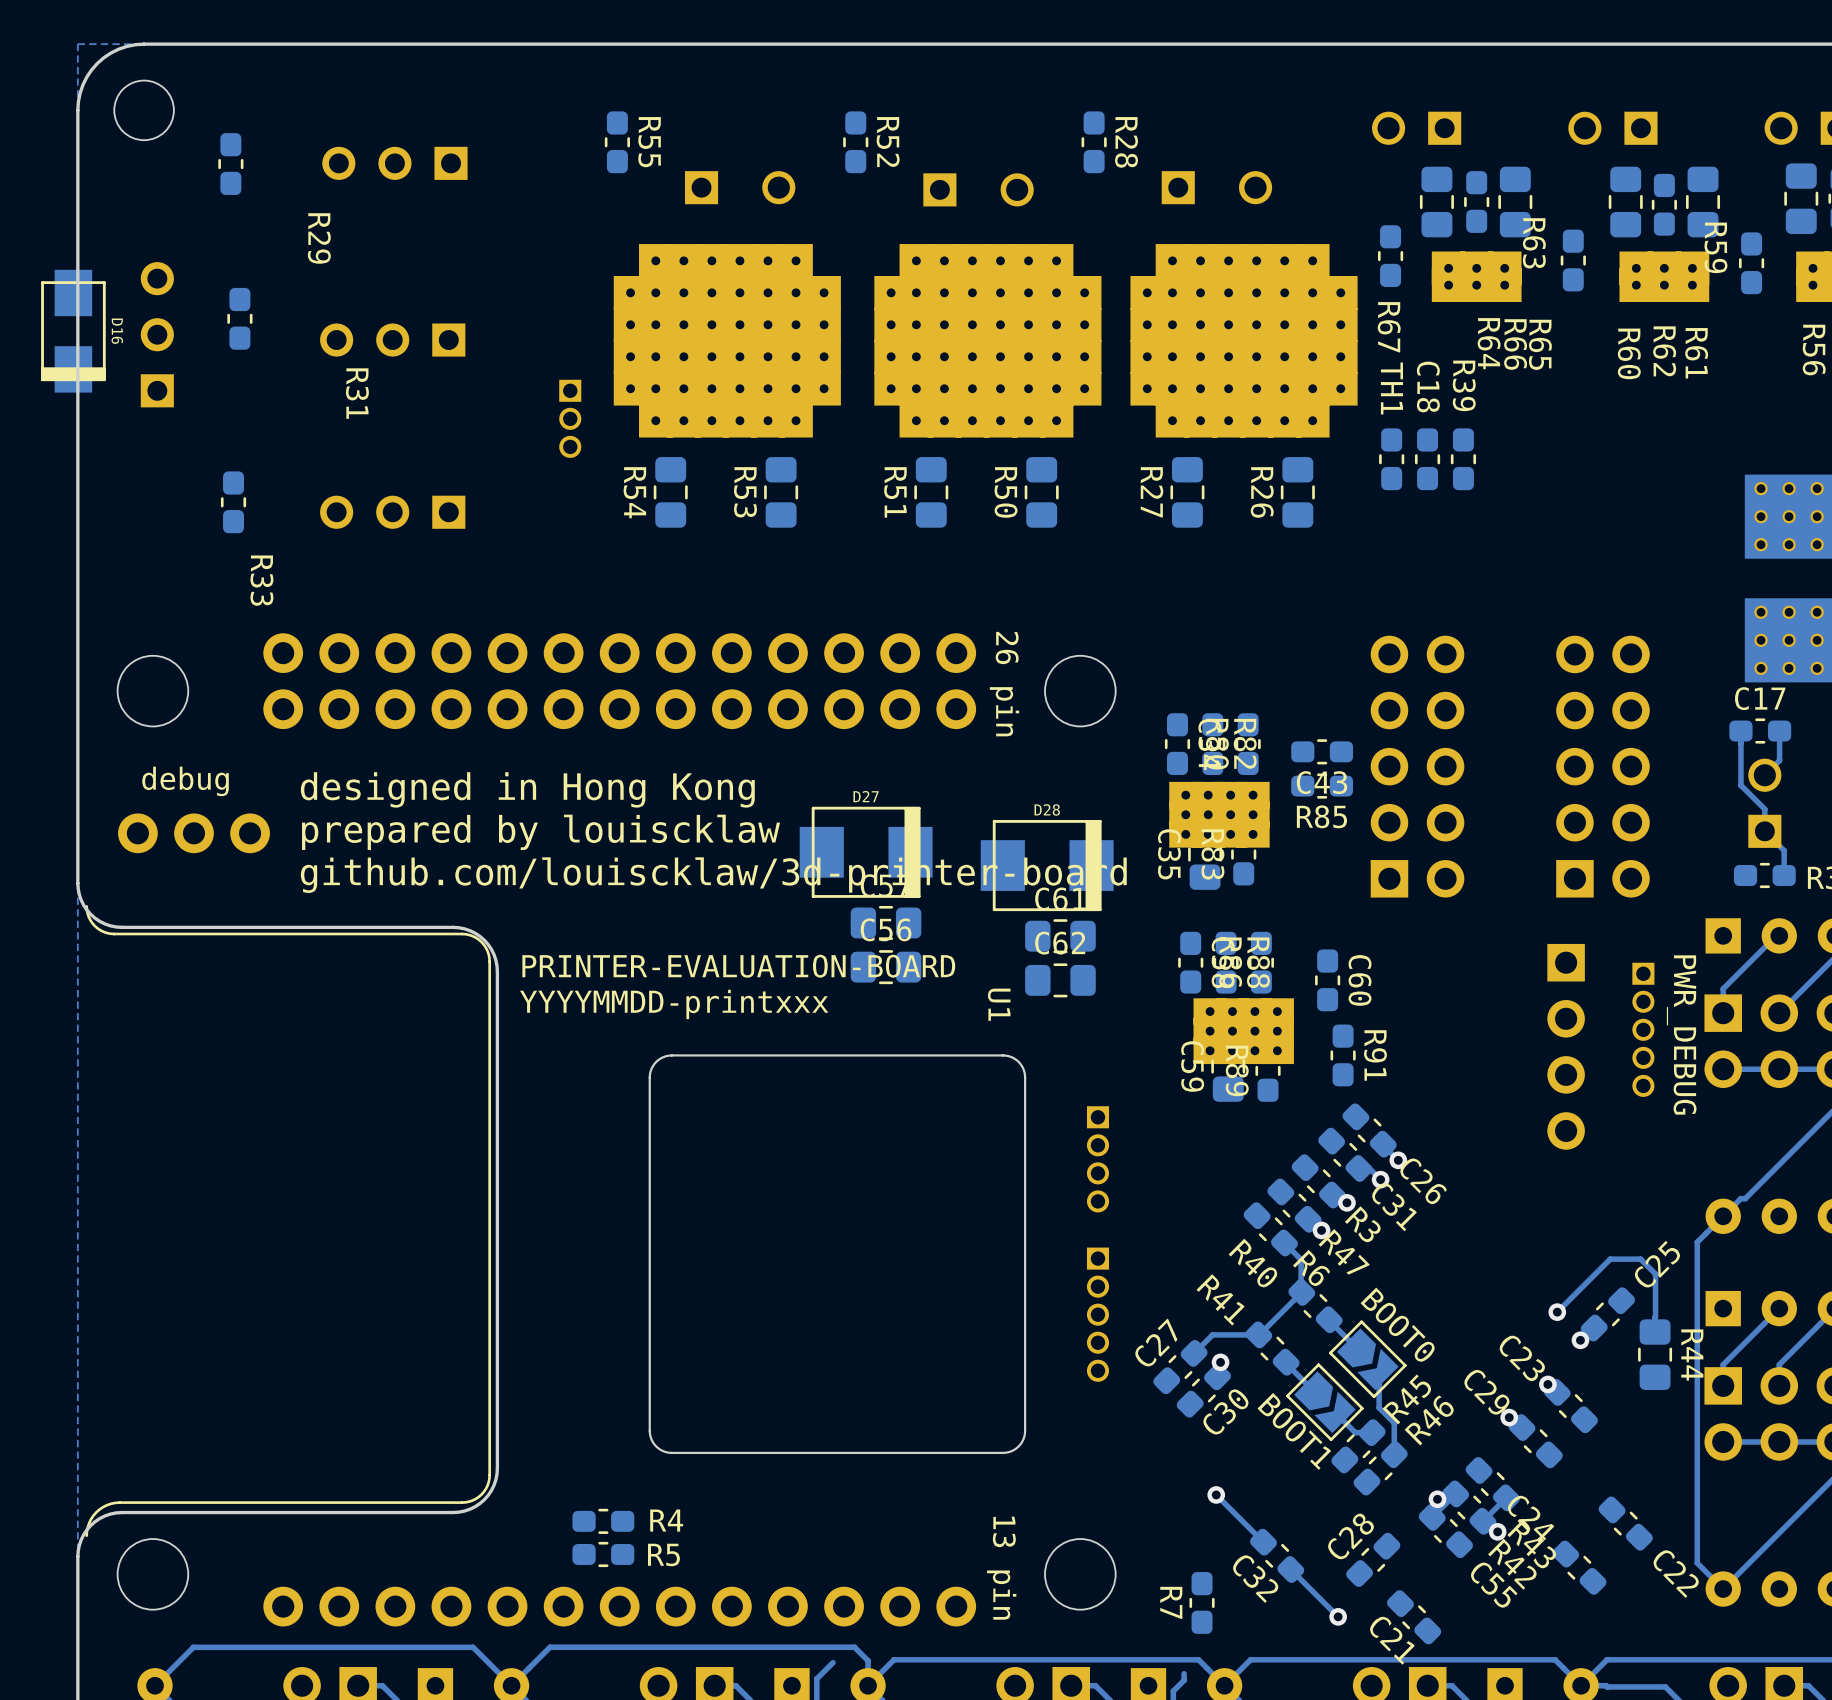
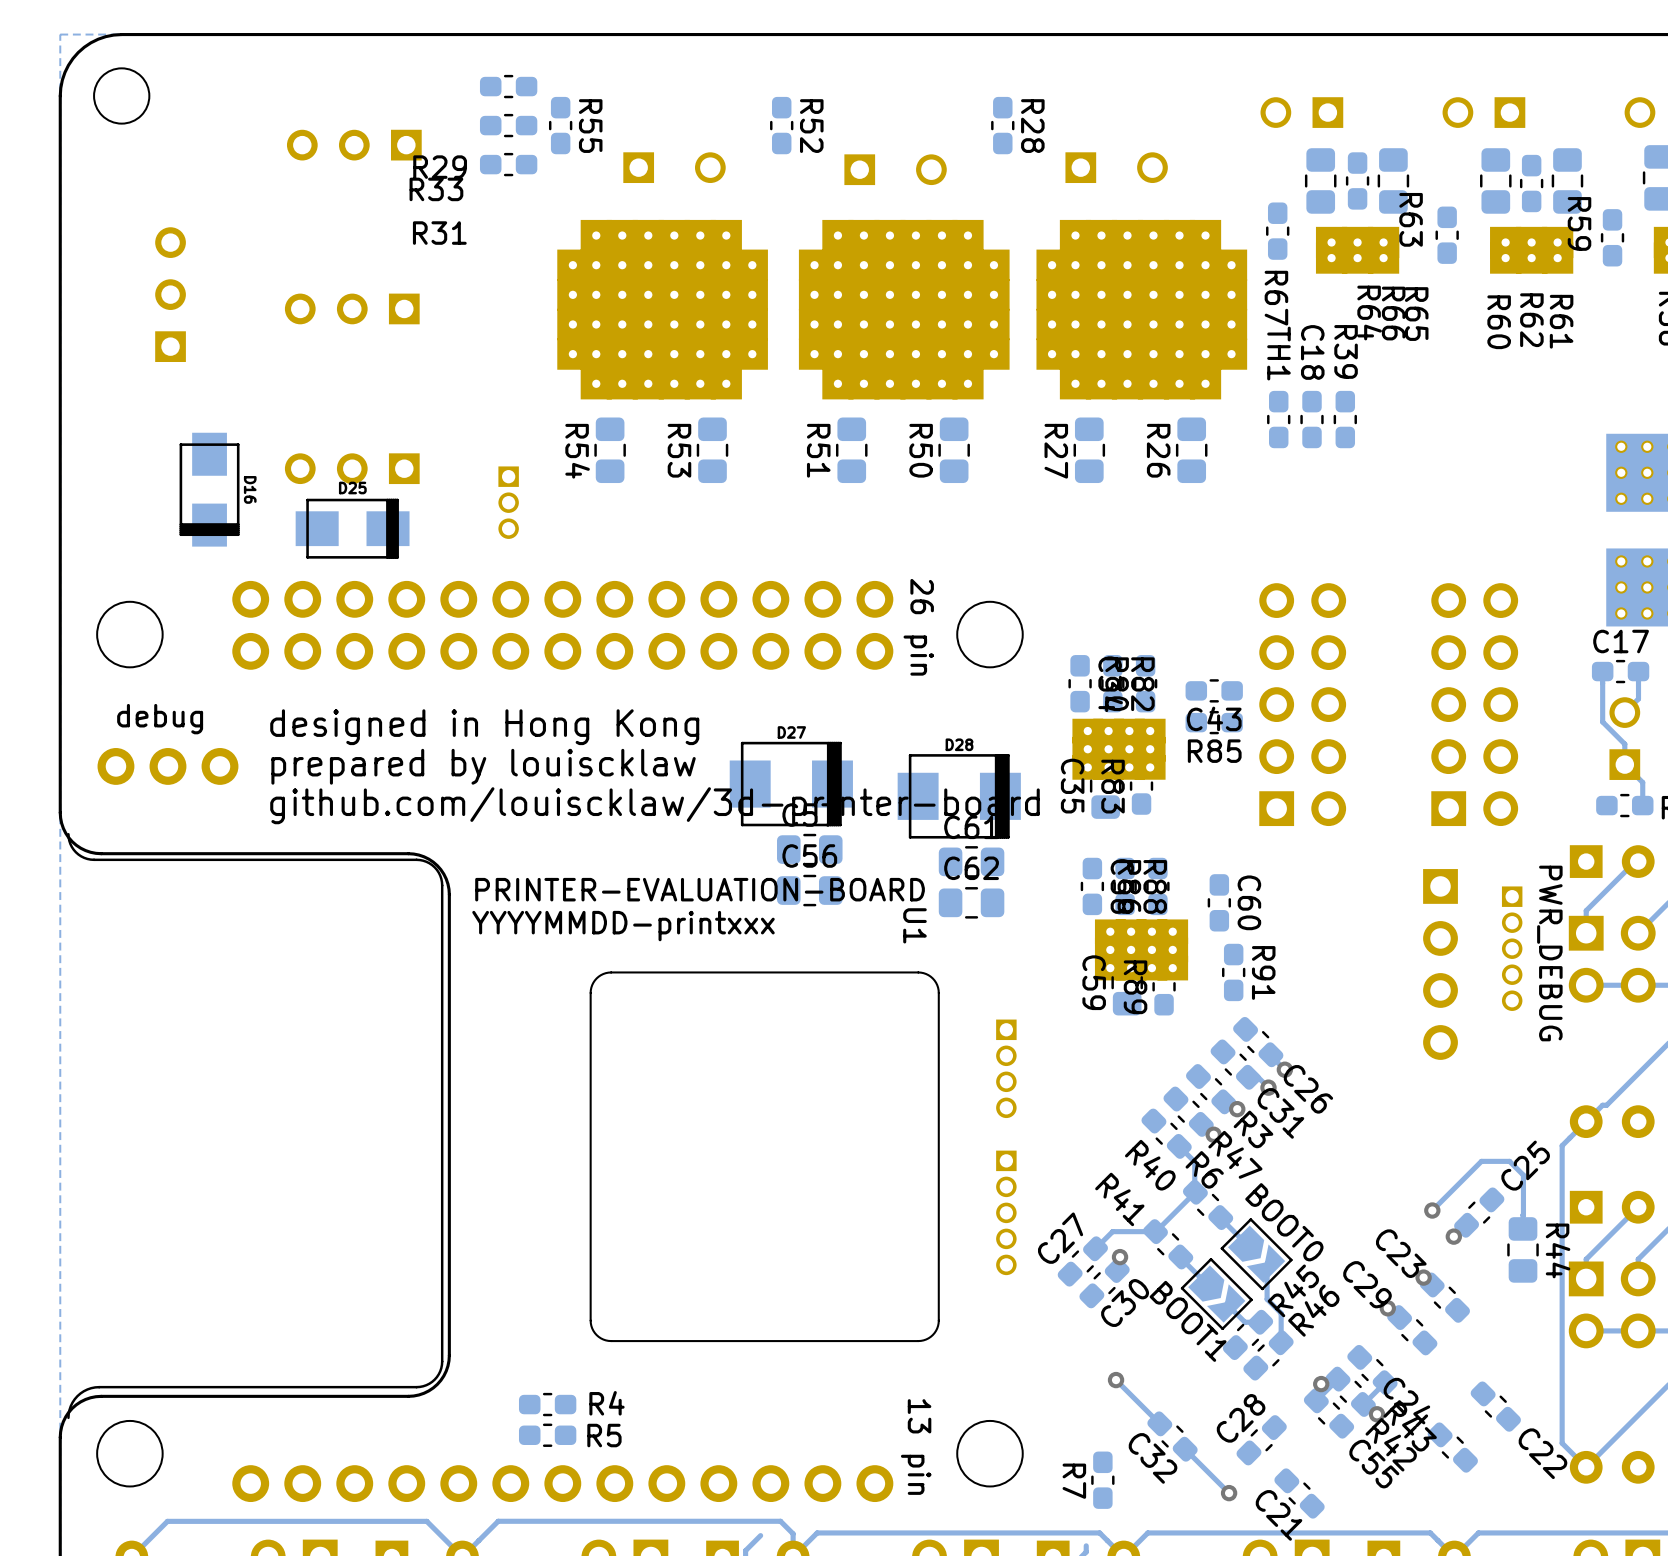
R29 rotation: 0° (230, 164) -> 90° clockwise (508, 86)
R29 position: (230, 164) -> (508, 86)
R31 rotation: 0° (239, 318) -> 90° clockwise (508, 125)
R31 position: (239, 318) -> (508, 125)
D16 position: (73, 331) -> (209, 489)
part position: (157, 334) -> (170, 294)
part position: (570, 418) -> (508, 502)
R33 rotation: 0° (233, 502) -> 90° clockwise (508, 164)
R33 position: (233, 502) -> (508, 164)
D25: none -> (352, 528)

